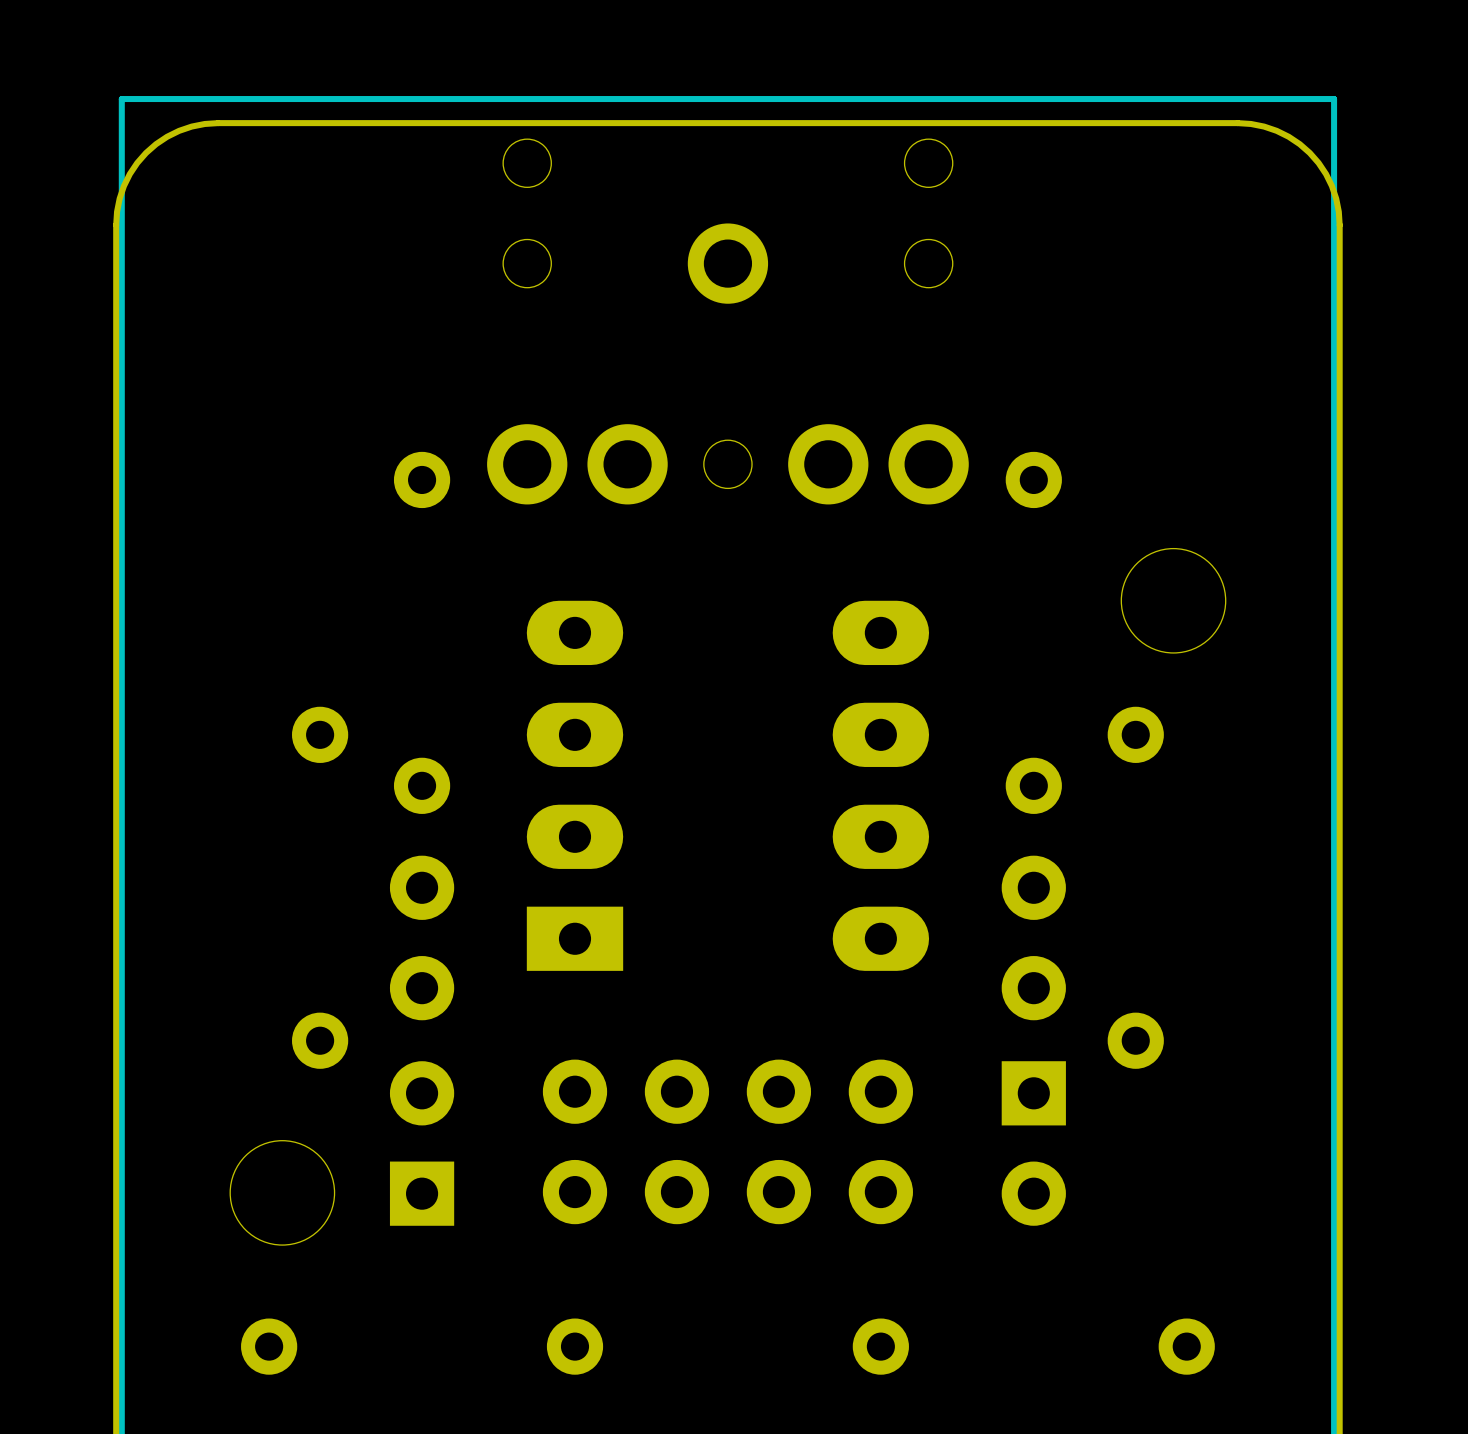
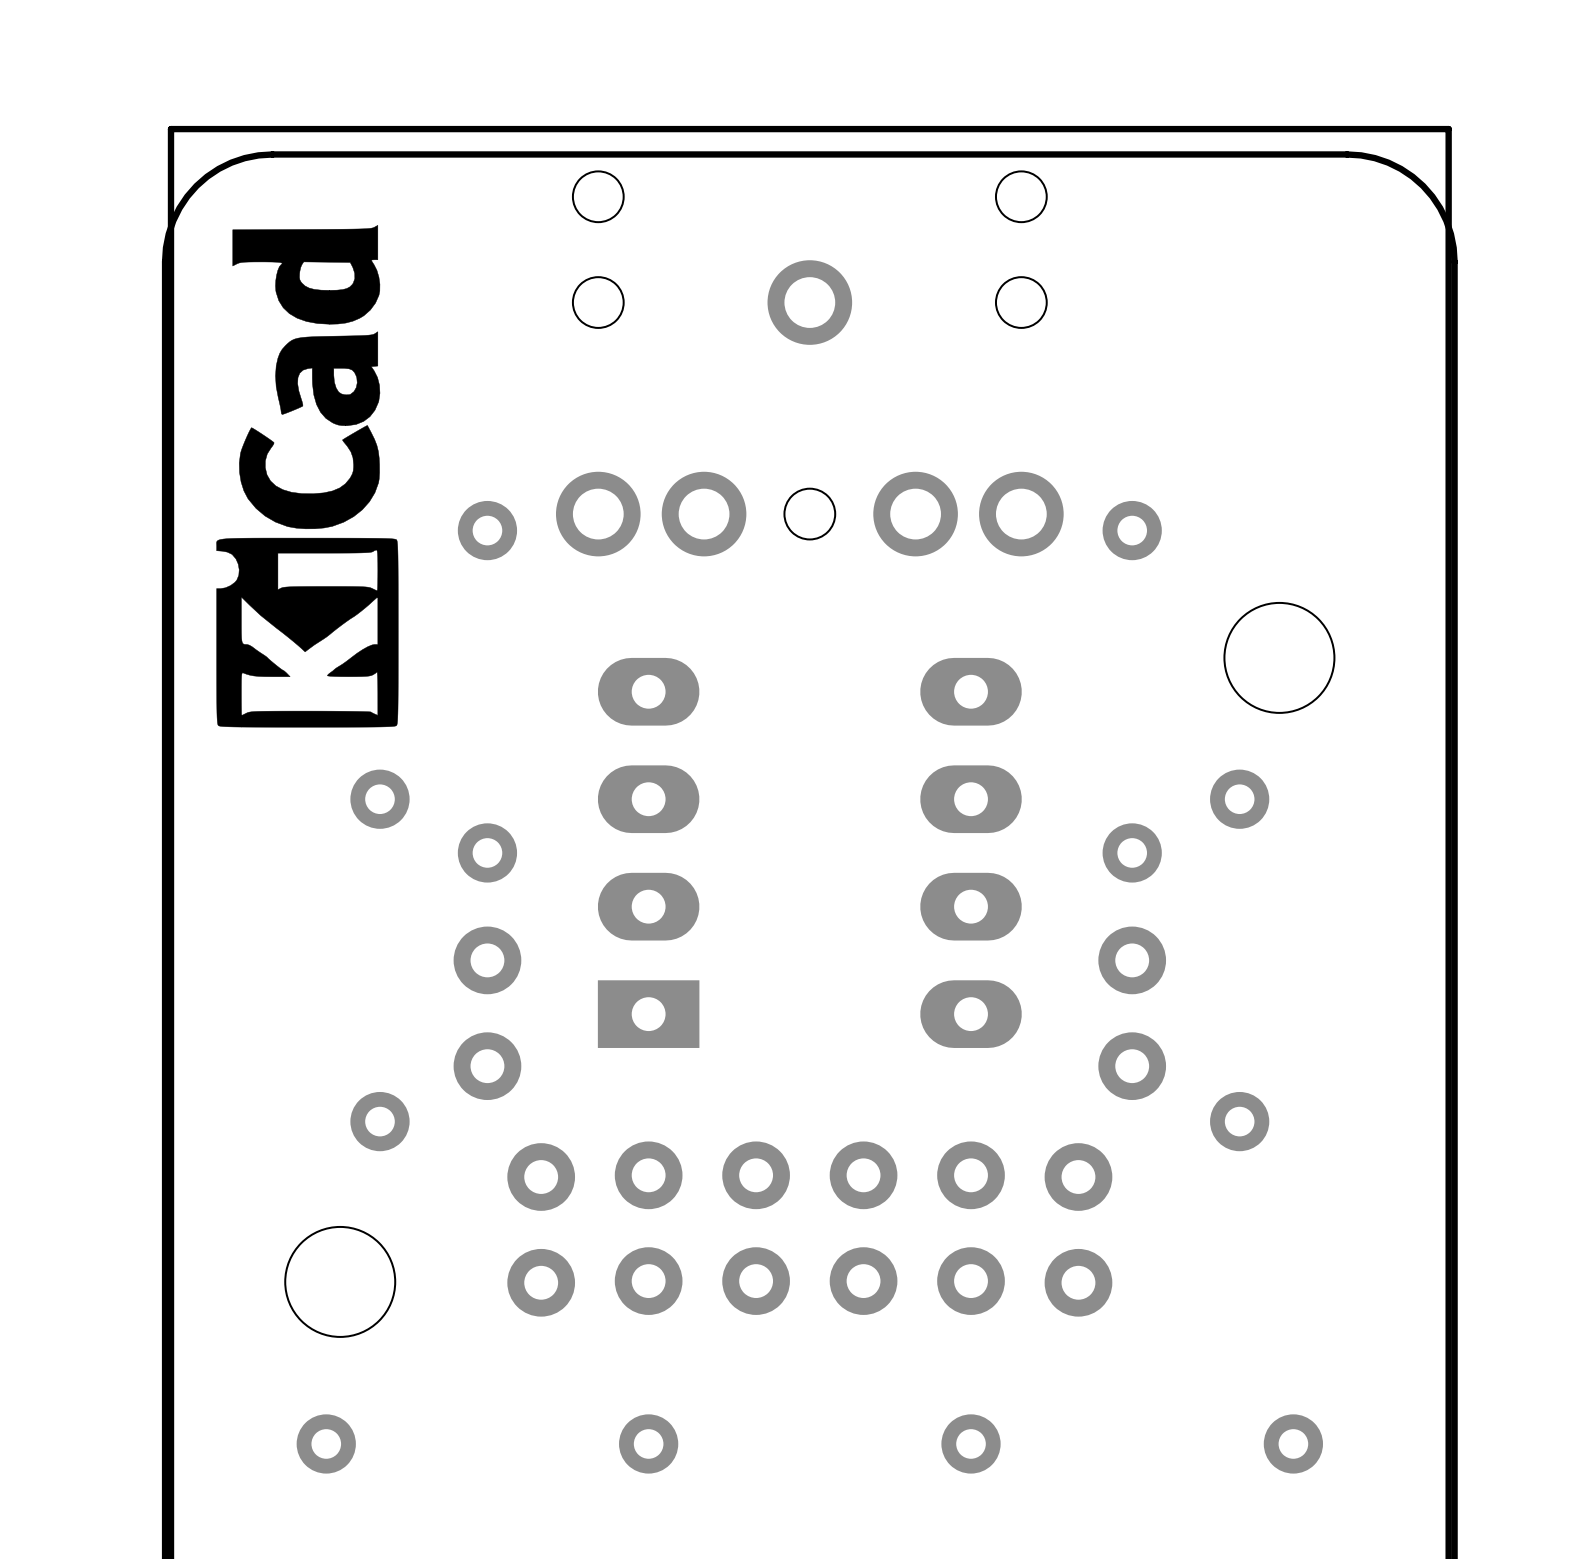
drawing: none -> [216, 225, 399, 728]
part: (422, 1143) -> none
part: none -> (541, 1229)
part: none -> (1078, 1229)
part: (1033, 1143) -> none

